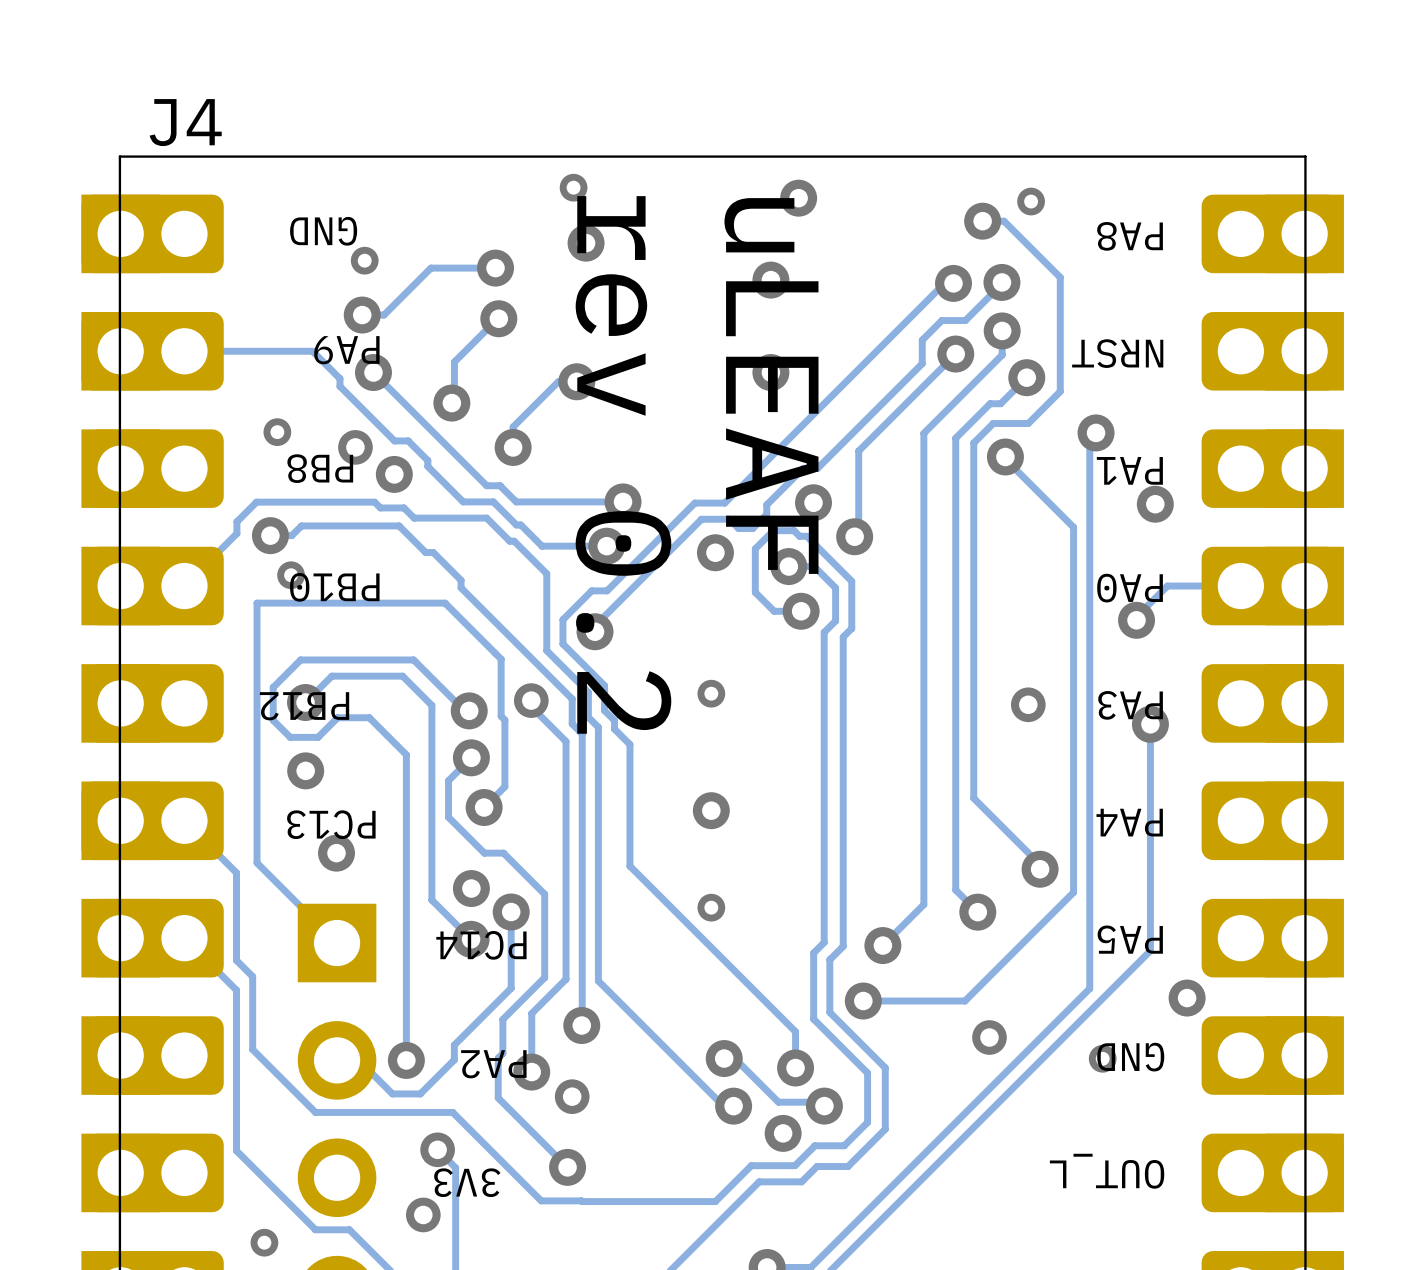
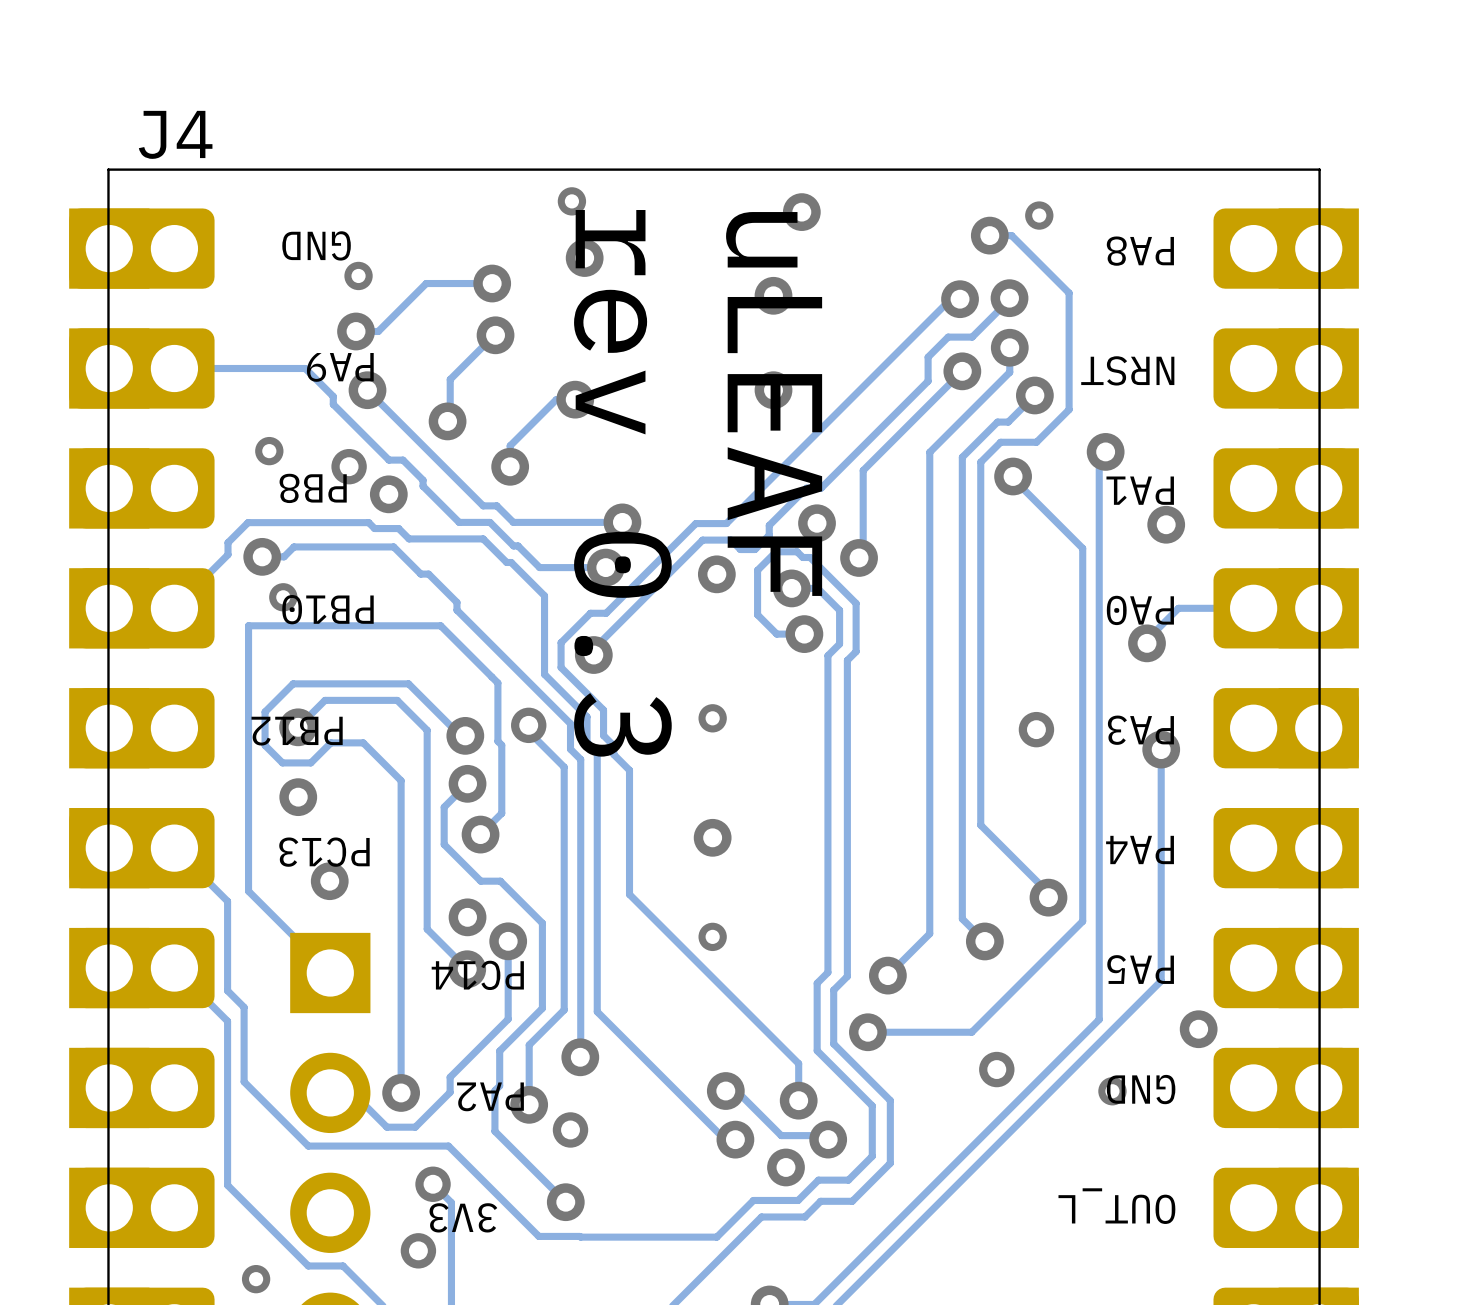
text: rev 0.2 (623, 464) -> rev 0.3 (622, 483)

